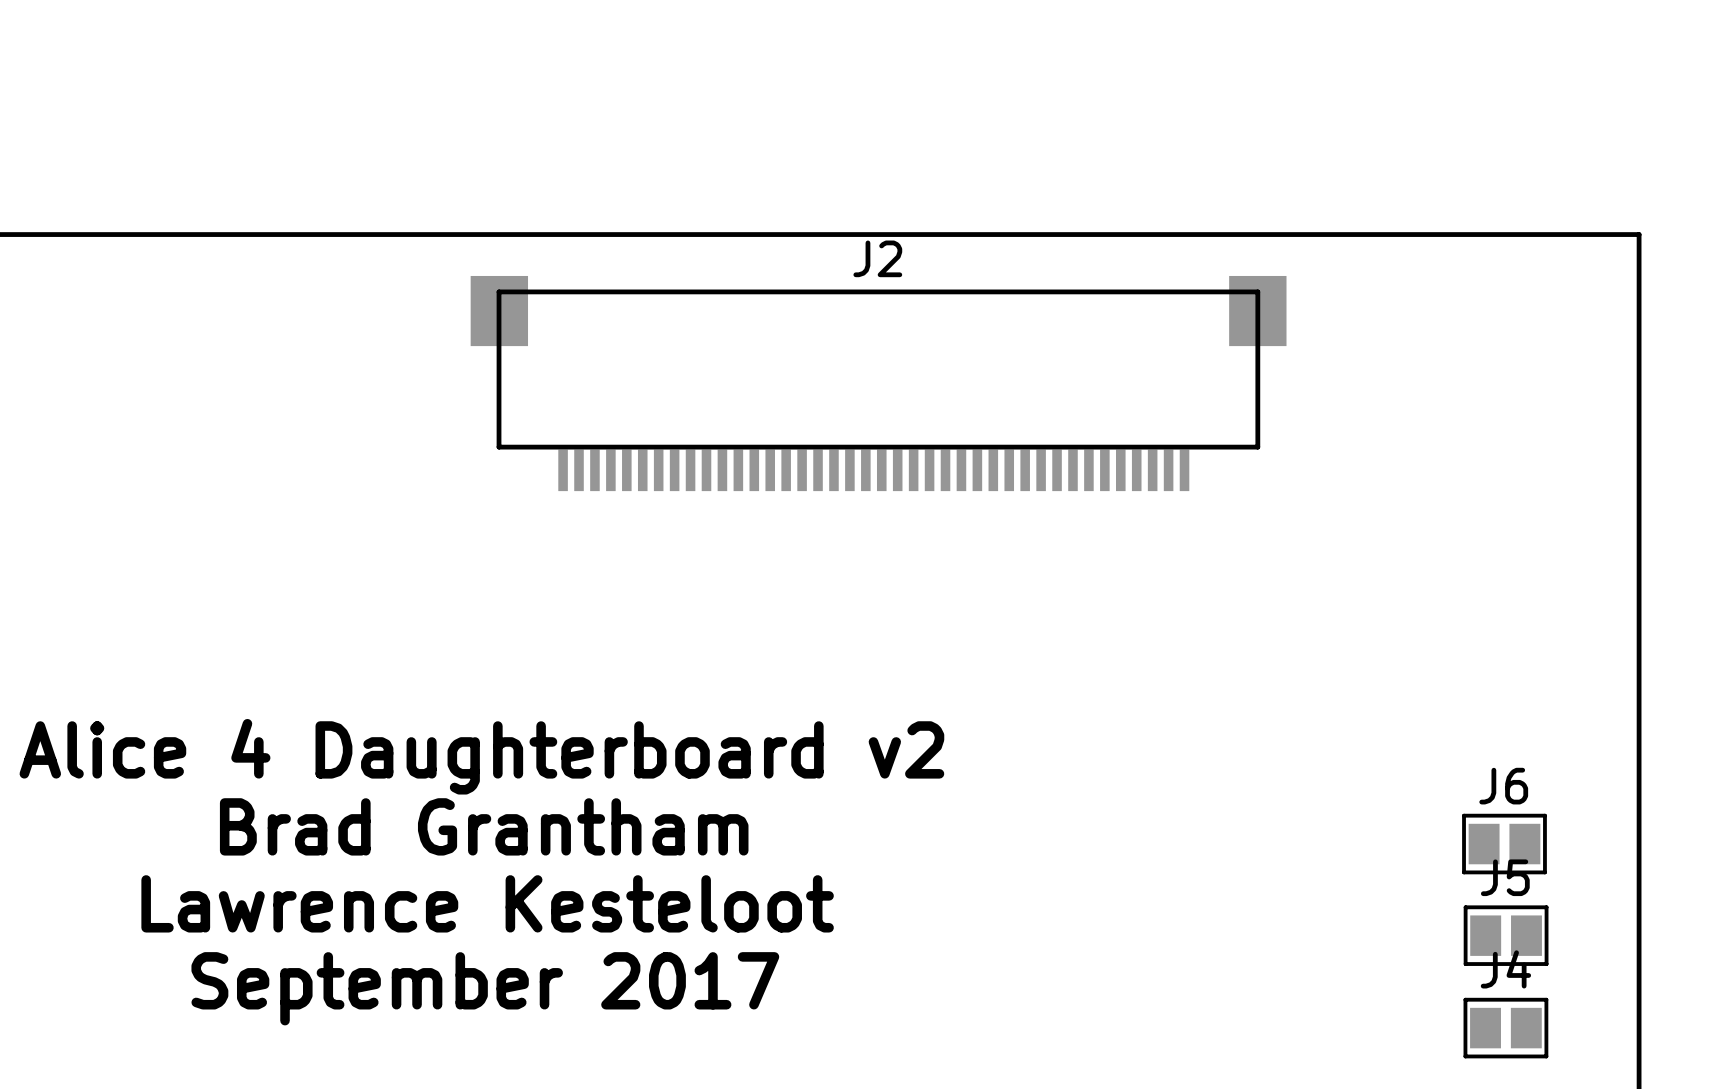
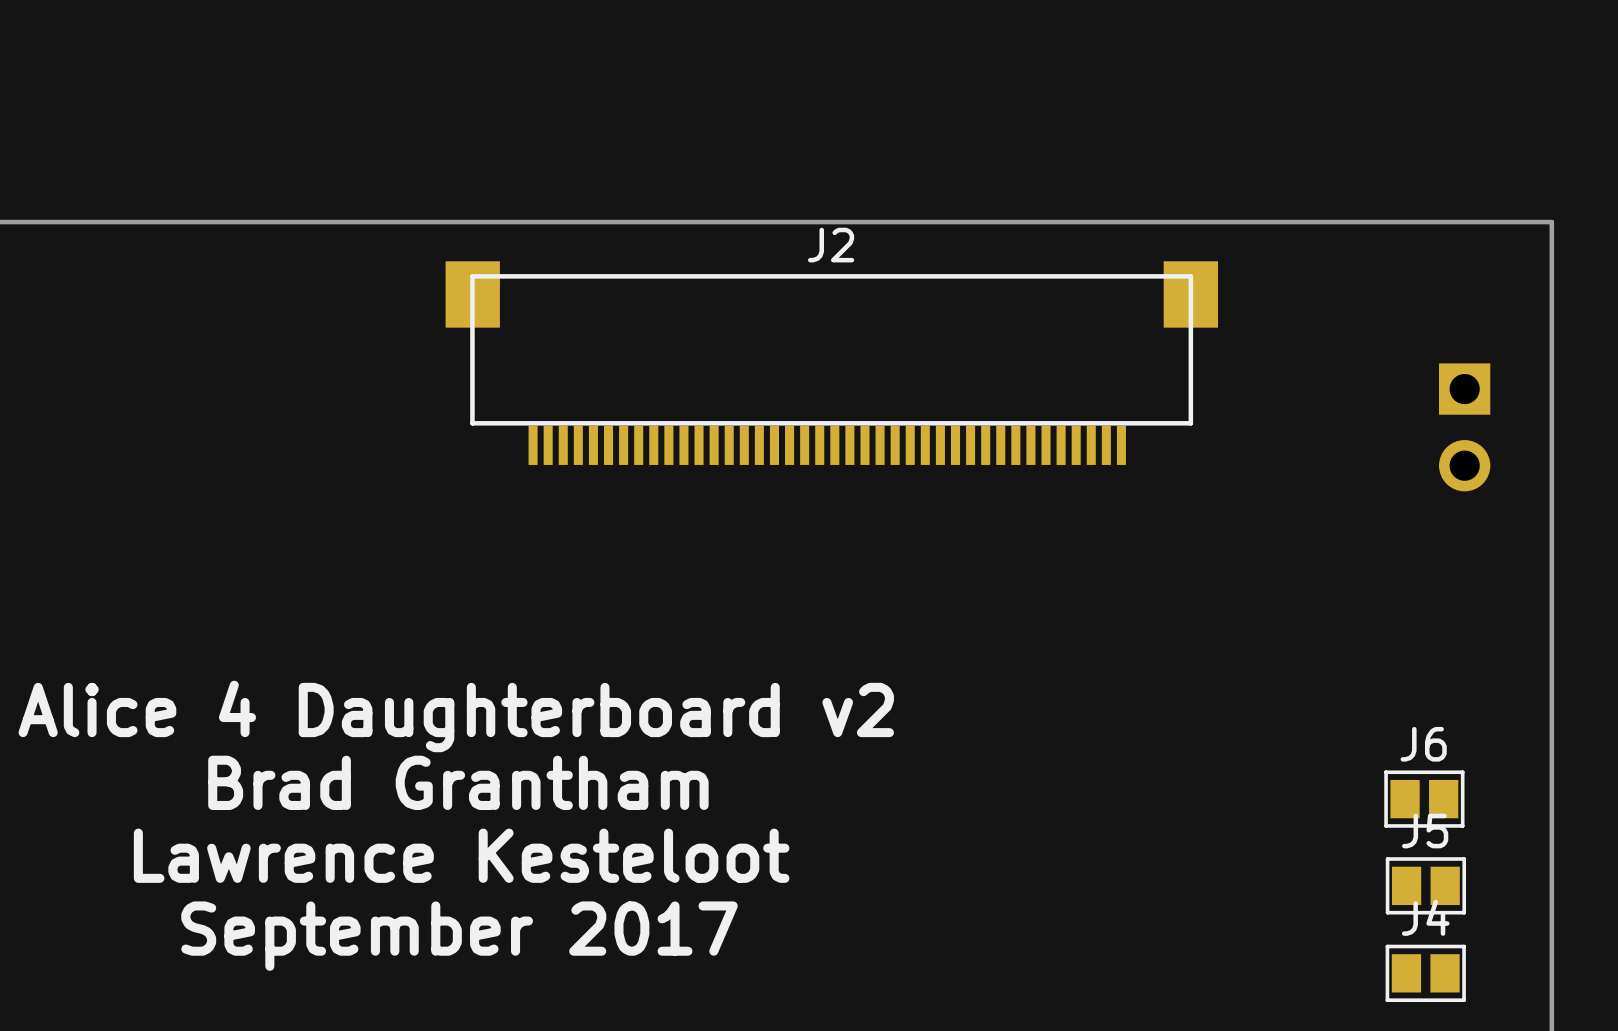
part: none -> (1464, 427)

